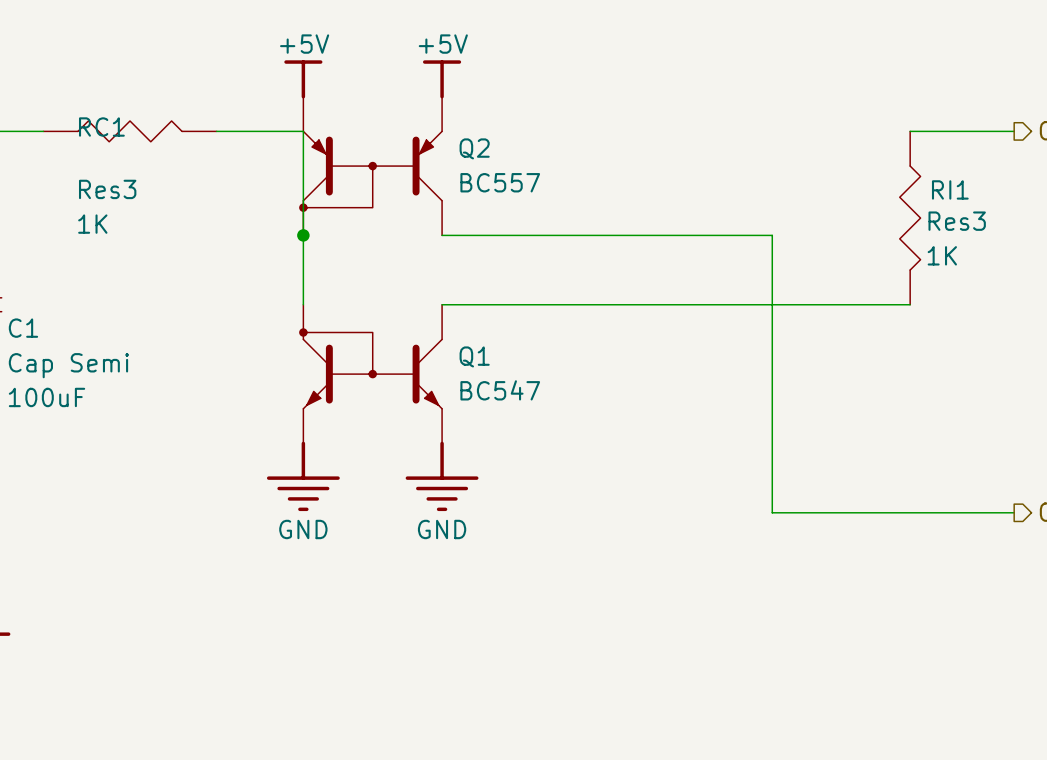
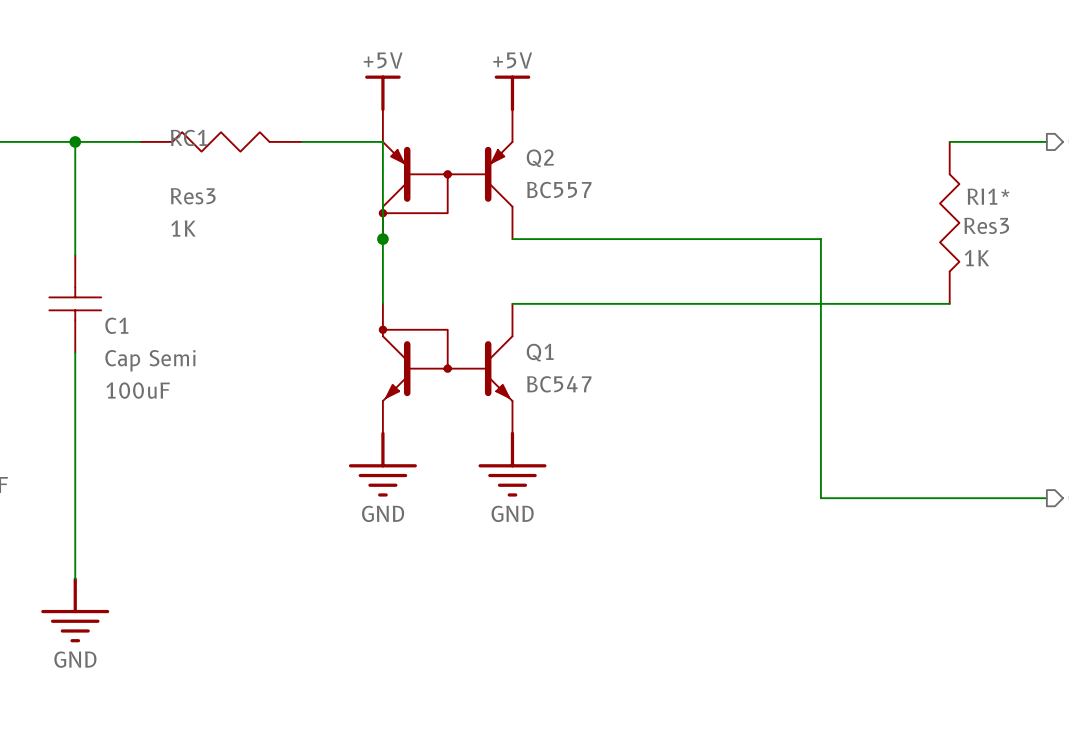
RI1 name: RI1 (950, 189) -> RI1* (988, 196)

